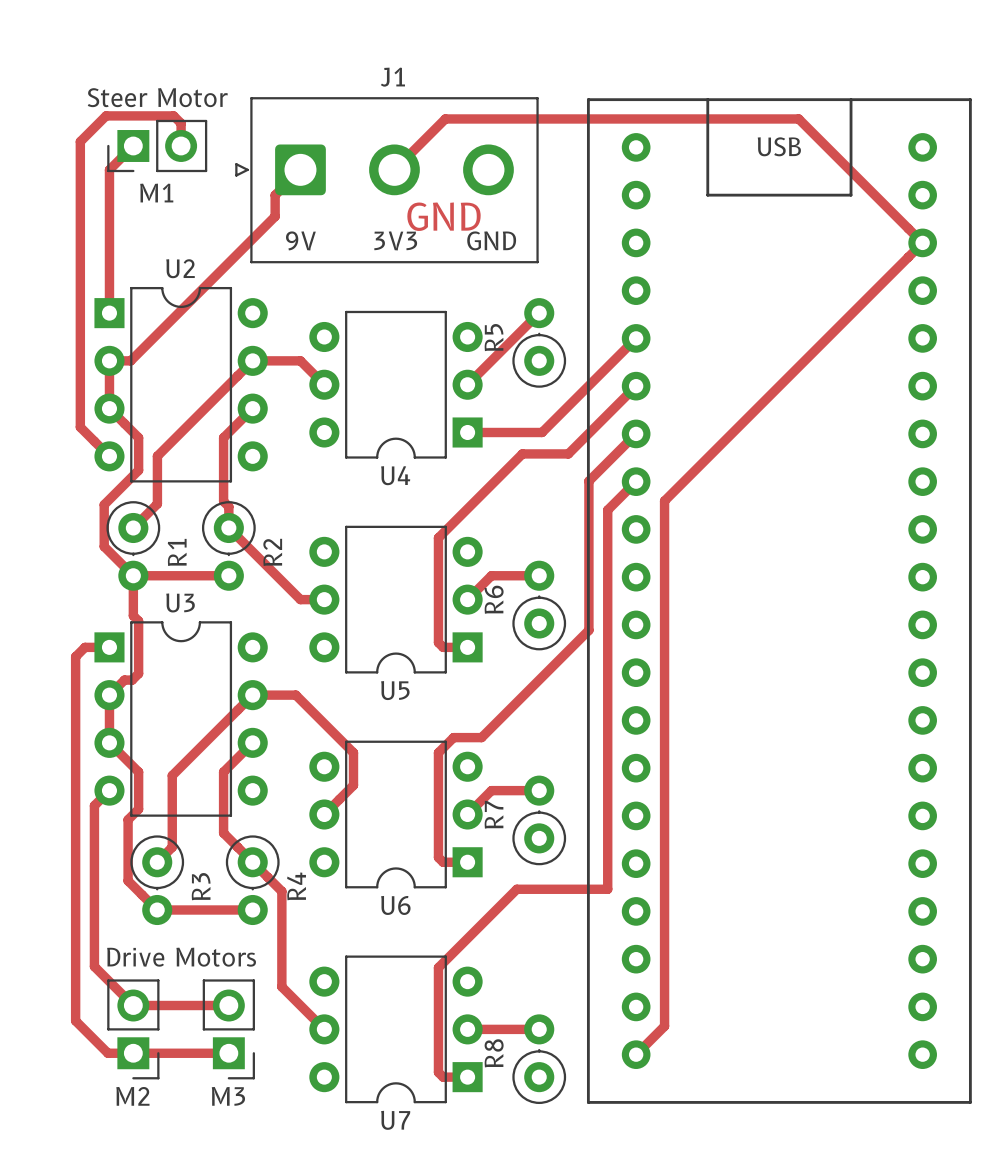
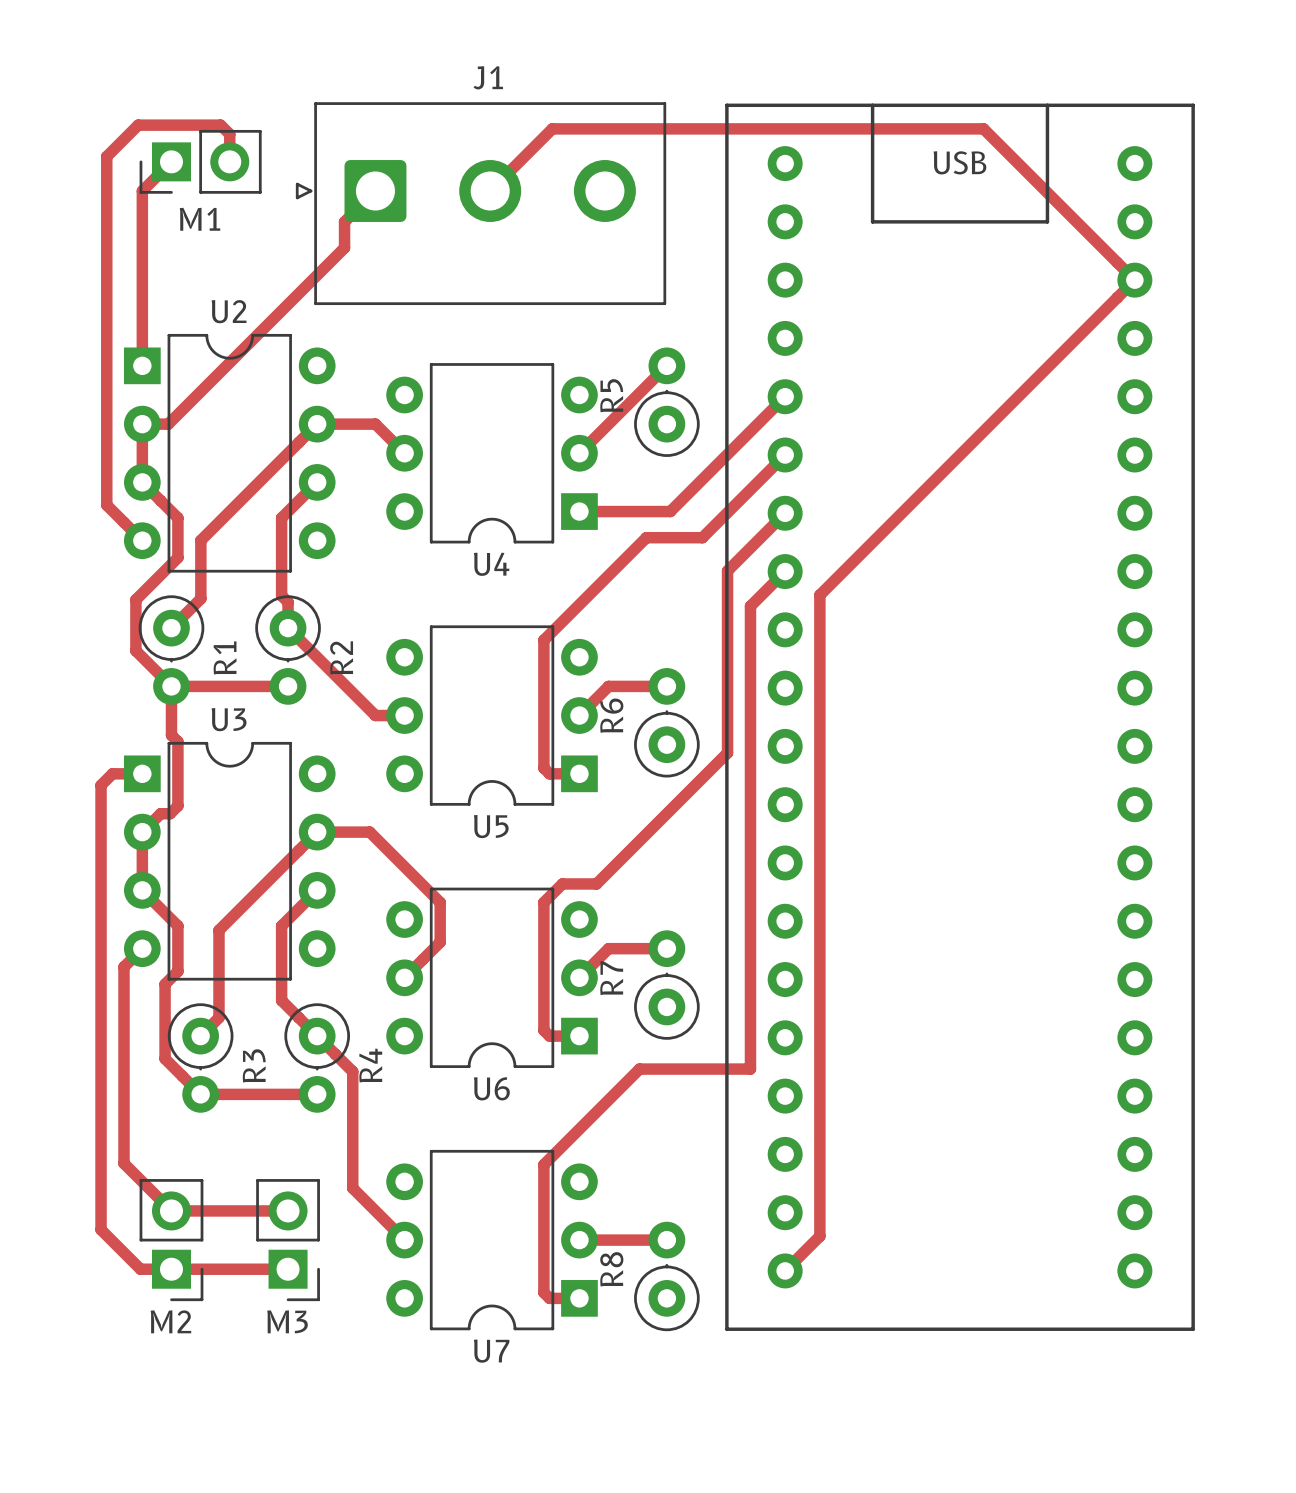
M1 value: Steer Motor (157, 97) -> none
text: GND (443, 216) -> none
text: 9V (300, 240) -> none
text: 3V3 (395, 240) -> none
text: GND (491, 240) -> none
M2 value: Drive Motors (181, 957) -> none

